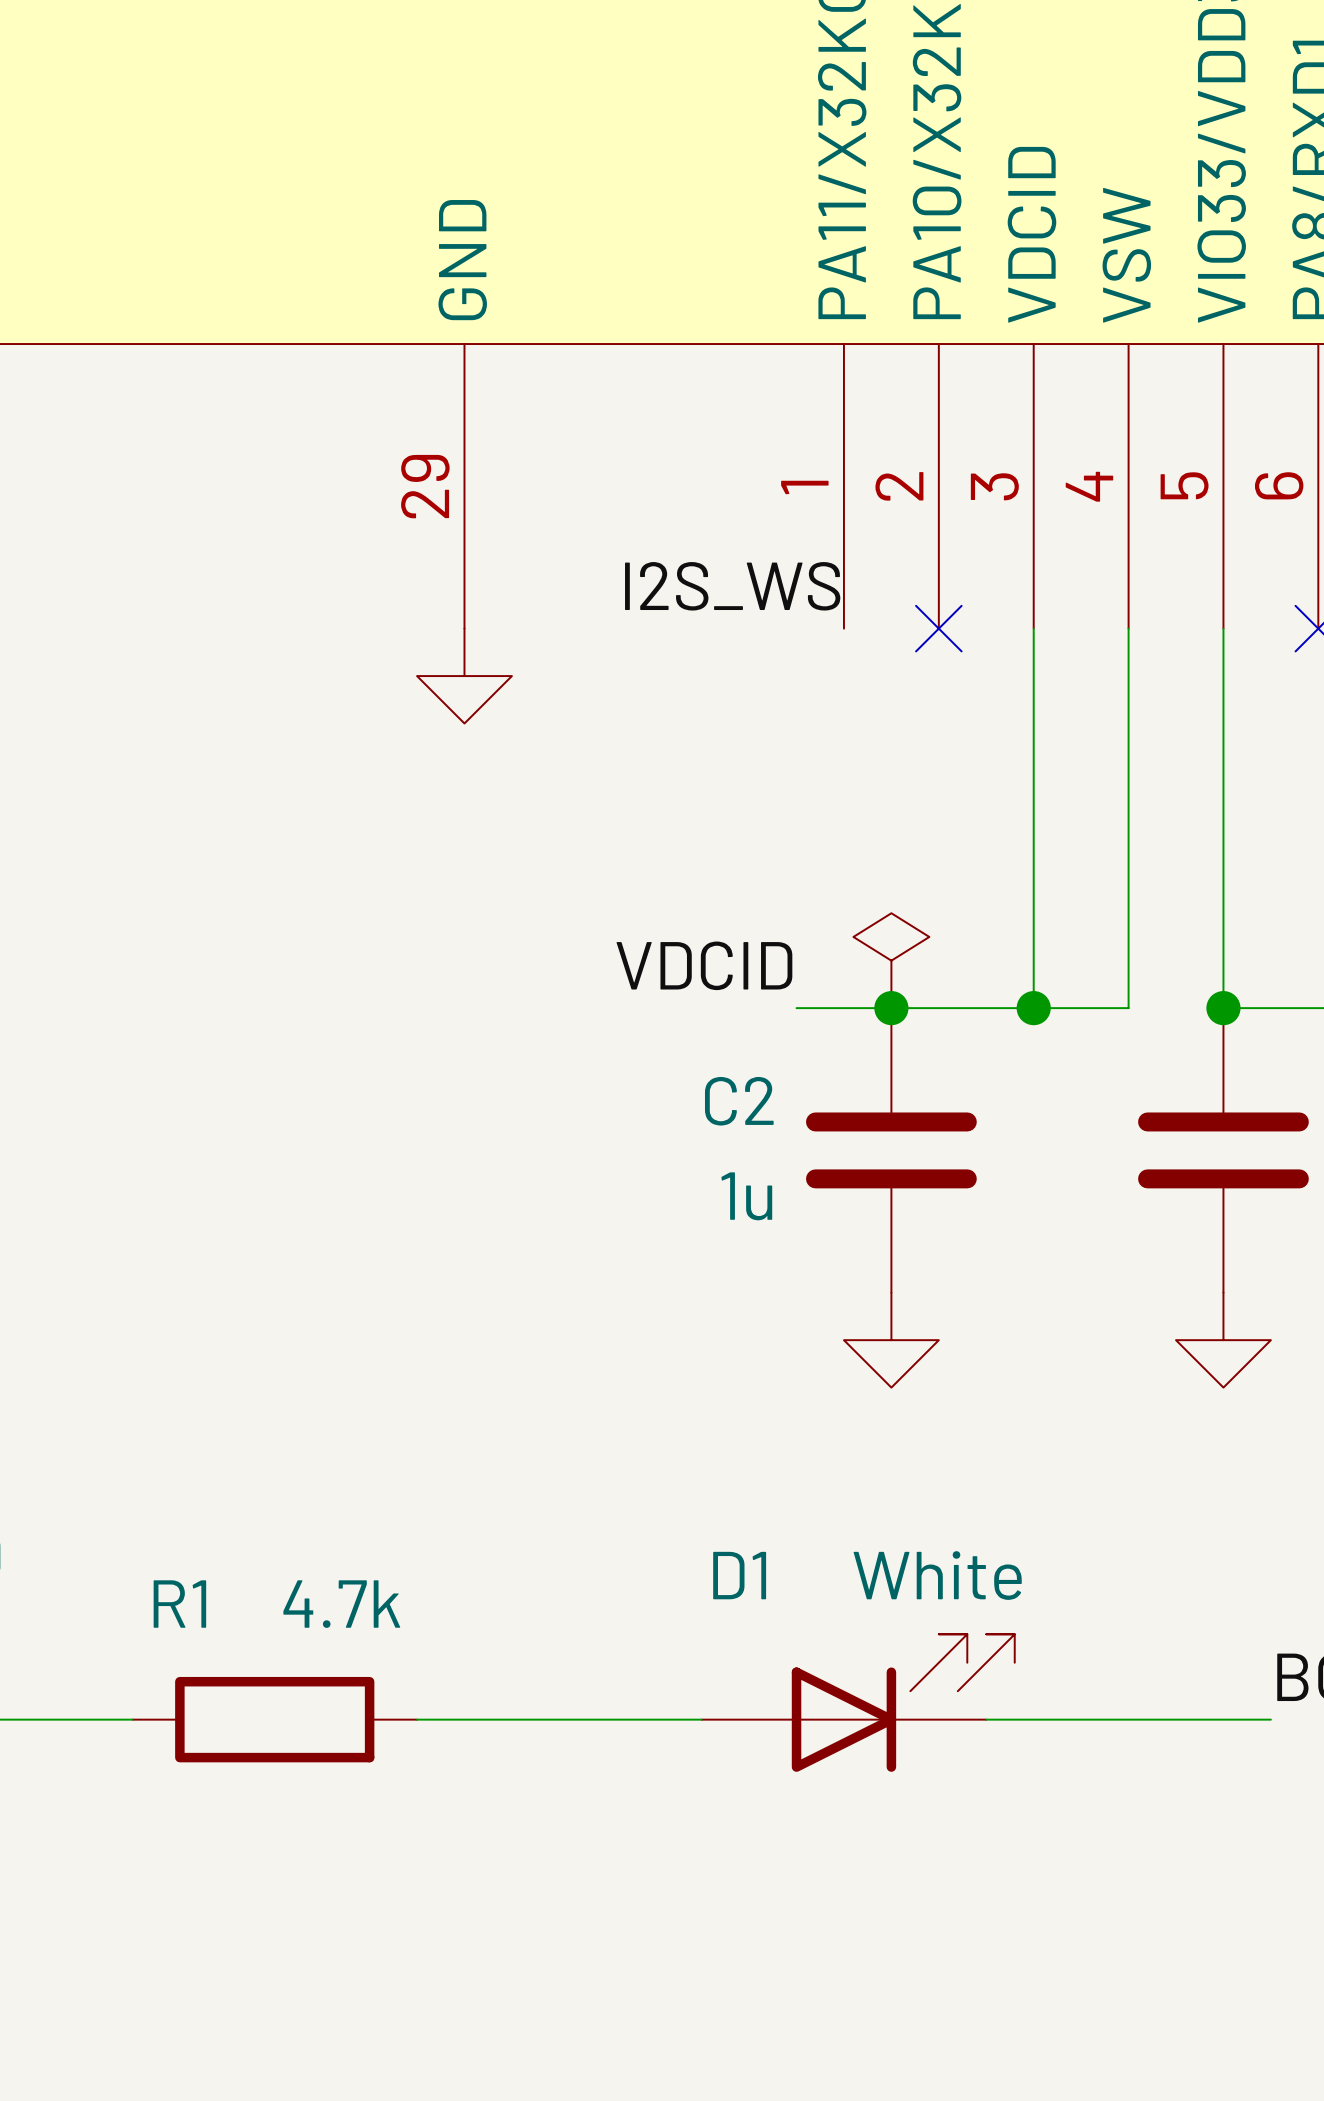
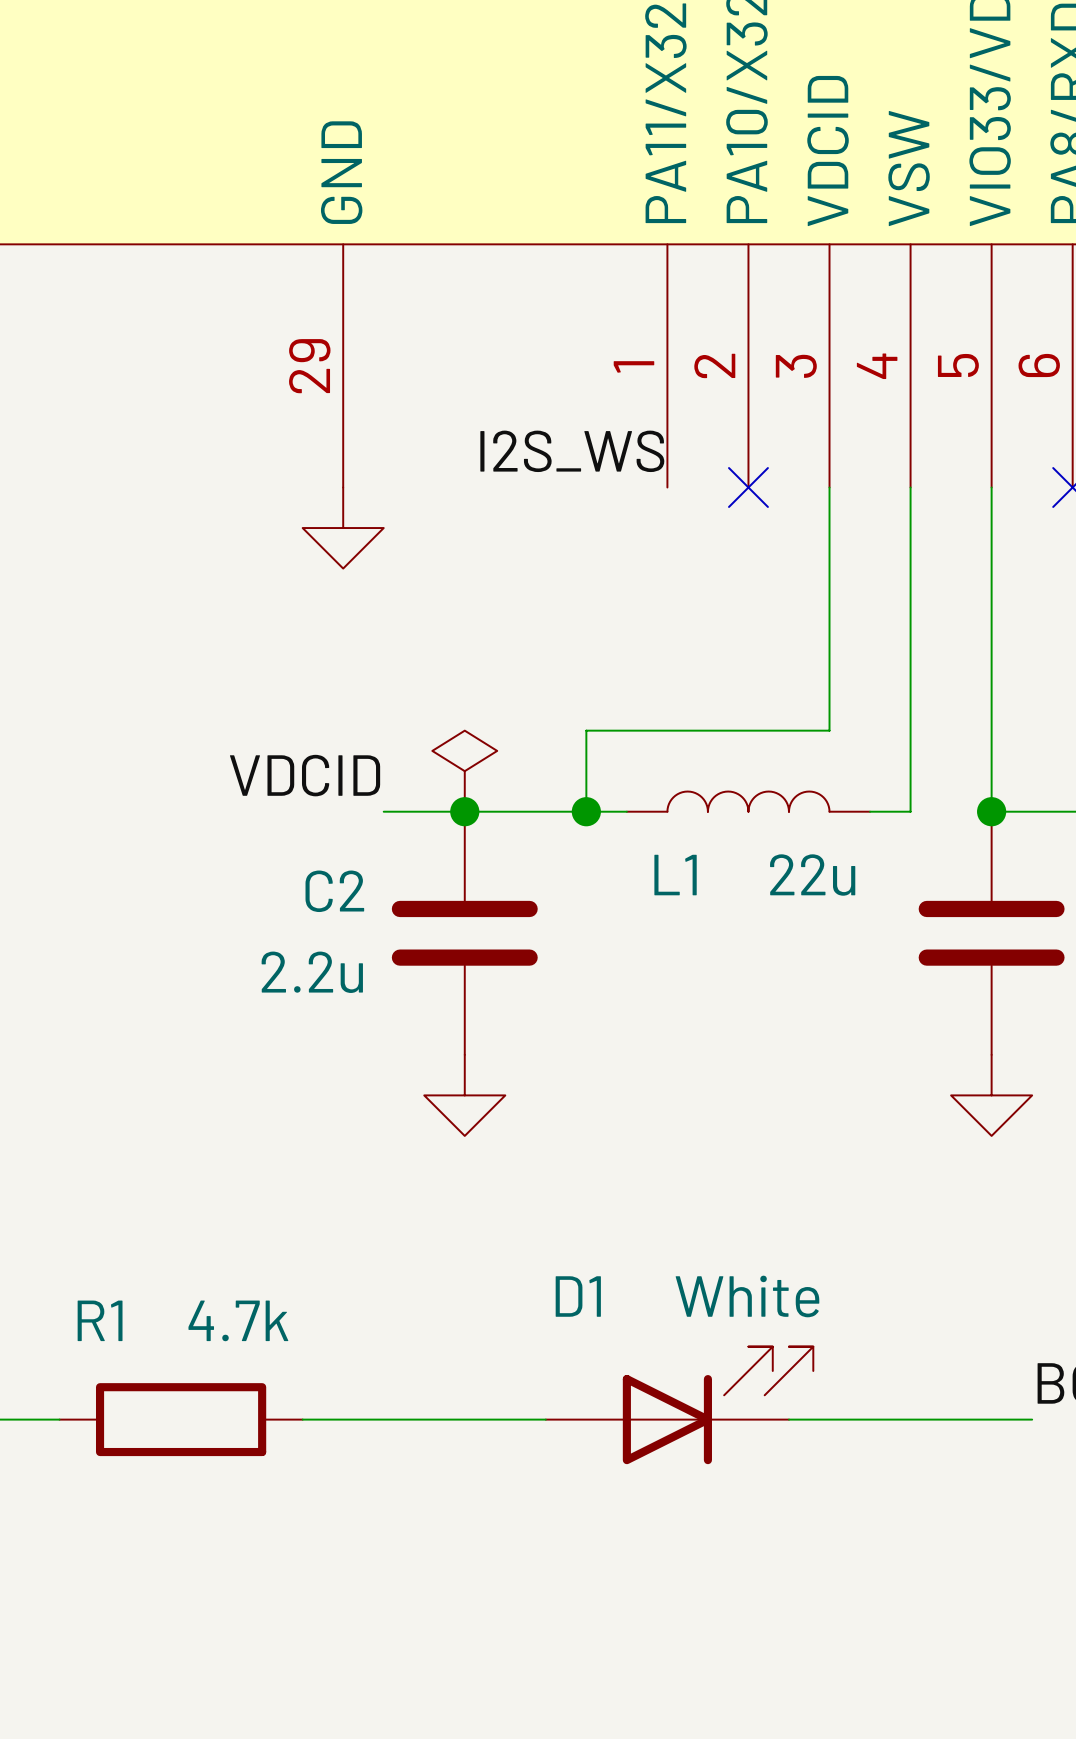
wire: (1033, 913) (1033, 1008) -> (829, 730) (586, 730) (586, 811)
power symbol position: (891, 960) -> (464, 771)
label position: VDCID (704, 965) -> VDCID (305, 775)
L1: none -> 22u (748, 801)
junction: none -> (464, 811)
junction: none -> (586, 811)
wire: (796, 1008) (1081, 1008) -> (626, 811) (383, 811)
junction: (891, 1008) -> none
junction: (1033, 1008) -> none
C2 position: (891, 1150) -> (464, 933)
C2 value: 1u (746, 1196) -> 2.2u (312, 972)
power symbol position: (891, 1340) -> (464, 1095)

